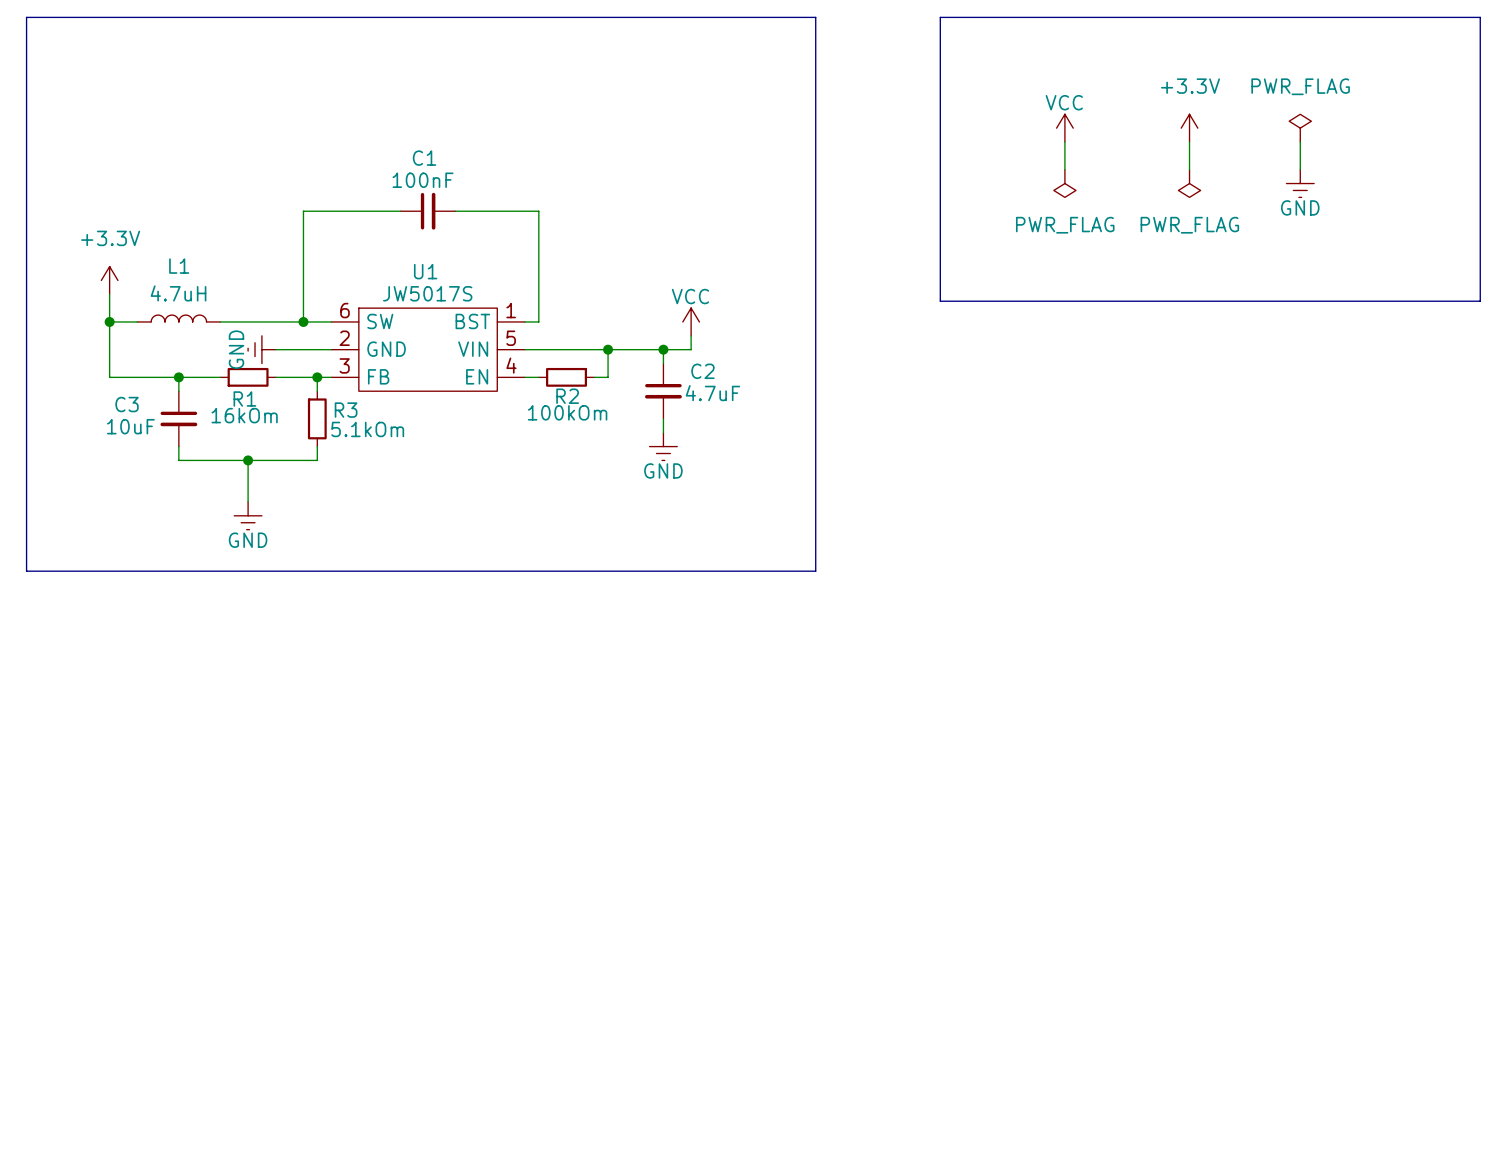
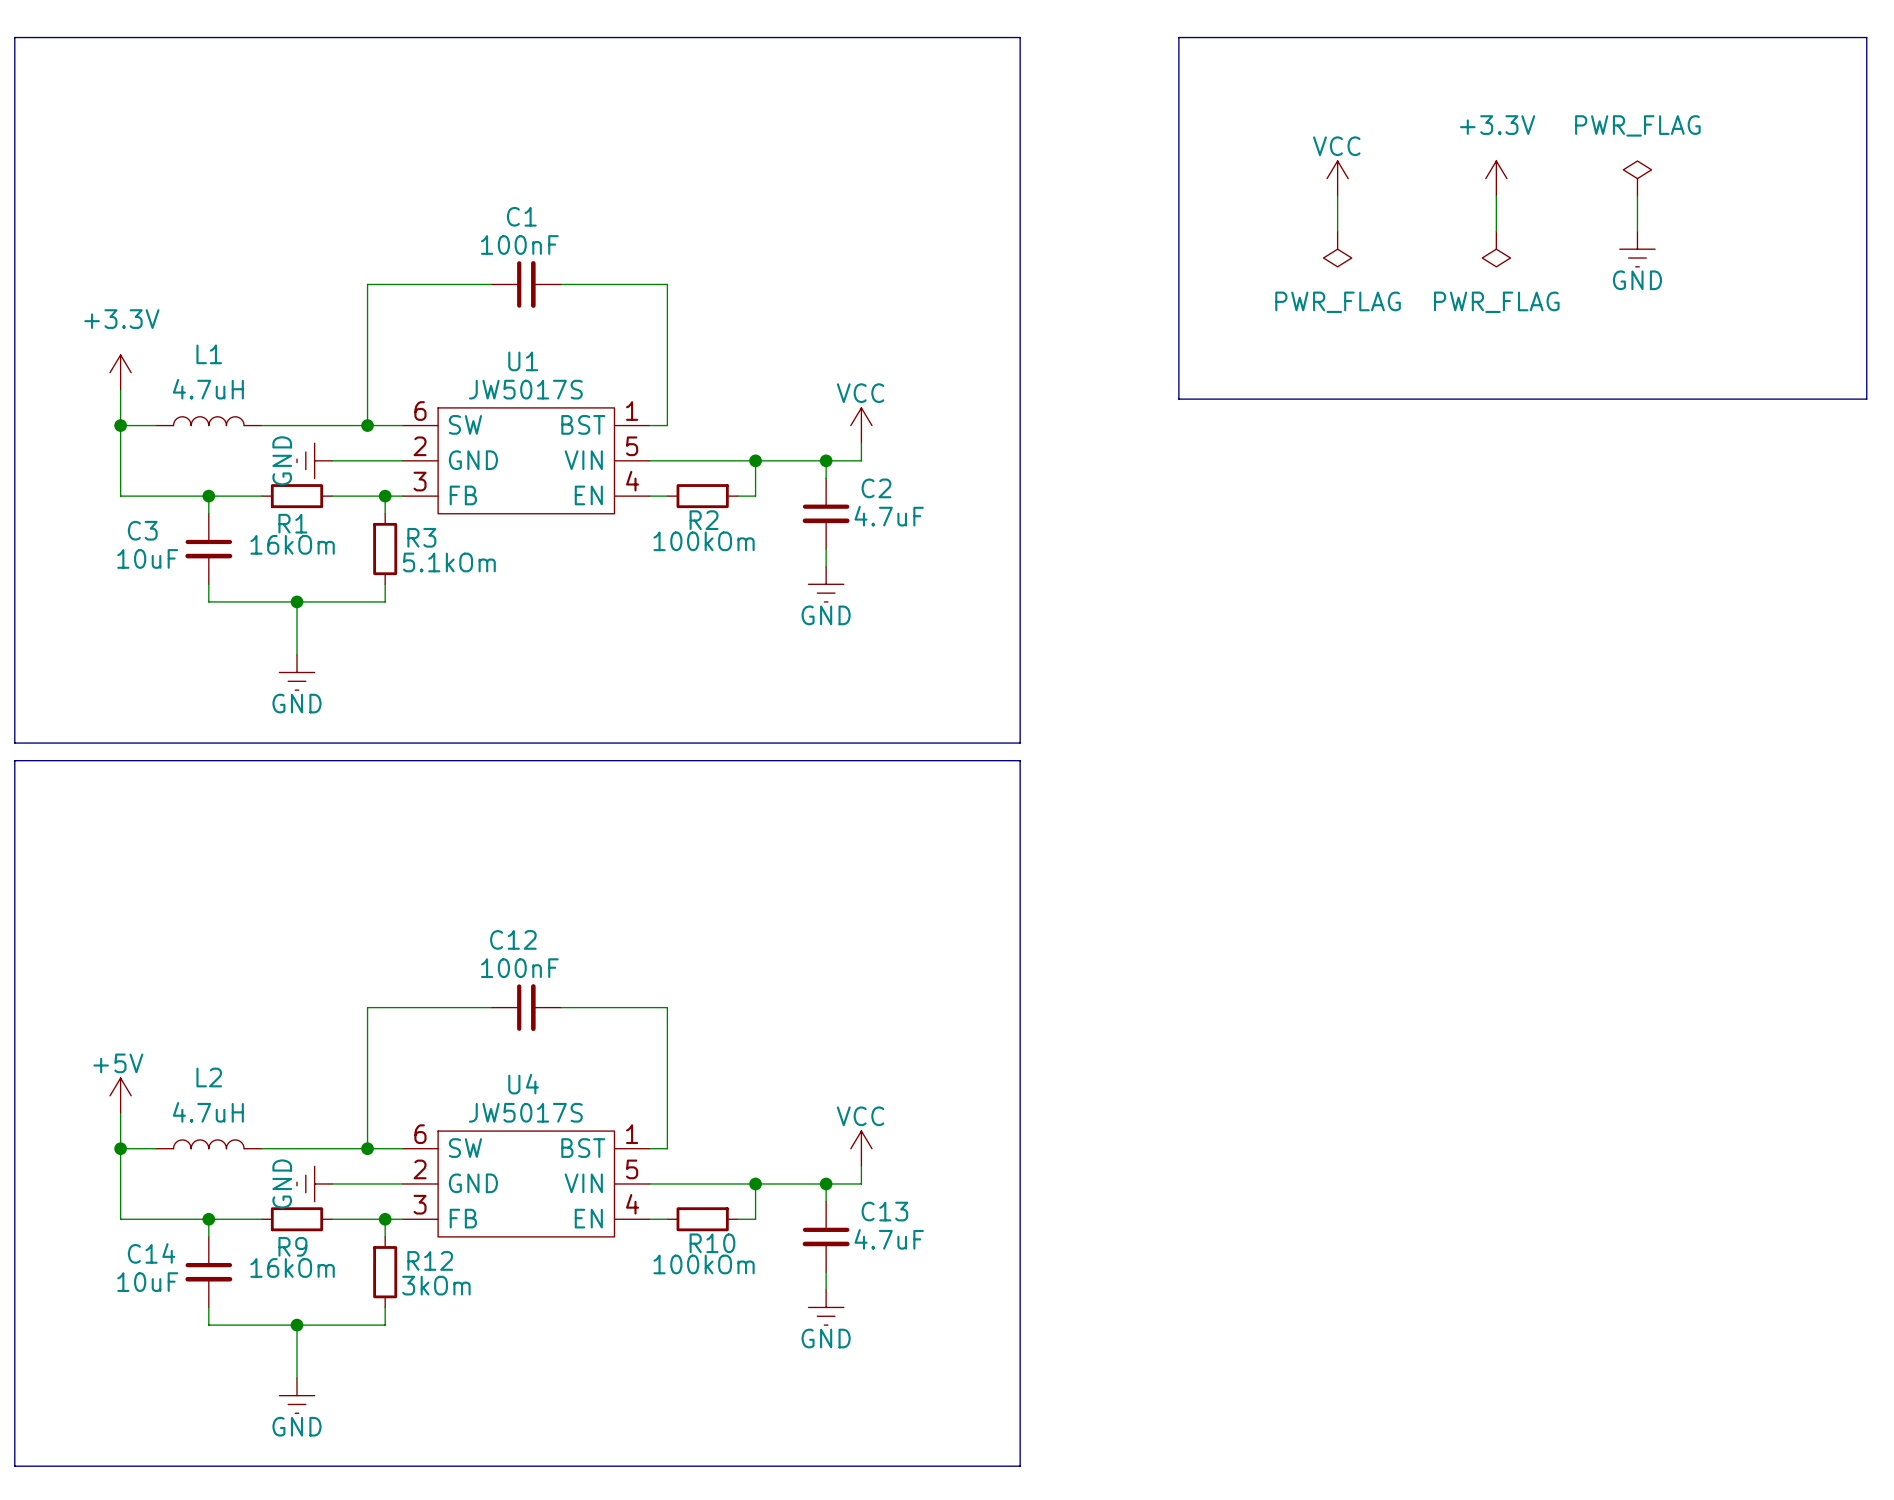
line: none -> (14, 760) (1020, 760) (1020, 1466) (14, 1466) (14, 760)
wire: none -> (491, 1007) (367, 1007) (367, 1148)
C12: none -> 100nF (526, 1007)
wire: none -> (561, 1007) (667, 1007) (667, 1148) (649, 1148)
power symbol: none -> +5V (120, 1095)
wire: none -> (120, 1113) (120, 1219) (261, 1219)
L2: none -> 4.7uH (208, 1144)
wire: none -> (120, 1148) (155, 1148)
junction: none -> (120, 1148)
wire: none -> (261, 1148) (402, 1148)
junction: none -> (367, 1148)
power symbol: none -> VCC (861, 1148)
wire: none -> (861, 1166) (861, 1183) (649, 1183)
power symbol: none -> GND (314, 1183)
wire: none -> (332, 1183) (402, 1183)
U4: none -> JW5017S (526, 1183)
wire: none -> (755, 1183) (755, 1219) (737, 1219)
junction: none -> (755, 1183)
wire: none -> (826, 1183) (826, 1201)
junction: none -> (826, 1183)
wire: none -> (208, 1219) (208, 1236)
junction: none -> (208, 1219)
R9: none -> 16kOm (296, 1219)
wire: none -> (332, 1219) (402, 1219)
wire: none -> (385, 1219) (385, 1236)
junction: none -> (385, 1219)
wire: none -> (649, 1219) (667, 1219)
R10: none -> 100kOm (702, 1219)
C13: none -> 4.7uF (826, 1236)
C14: none -> 10uF (208, 1272)
R12: none -> 3kOm (385, 1272)
wire: none -> (826, 1272) (826, 1289)
wire: none -> (208, 1307) (208, 1325) (385, 1325) (385, 1307)
power symbol: none -> GND (826, 1307)
wire: none -> (296, 1325) (296, 1378)
junction: none -> (296, 1325)
power symbol: none -> GND (296, 1395)

